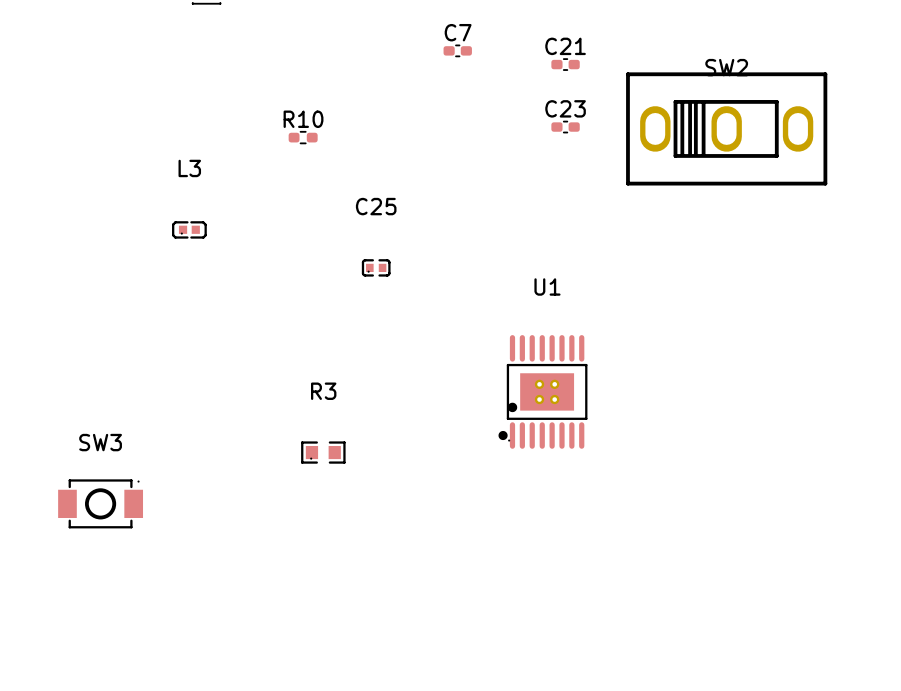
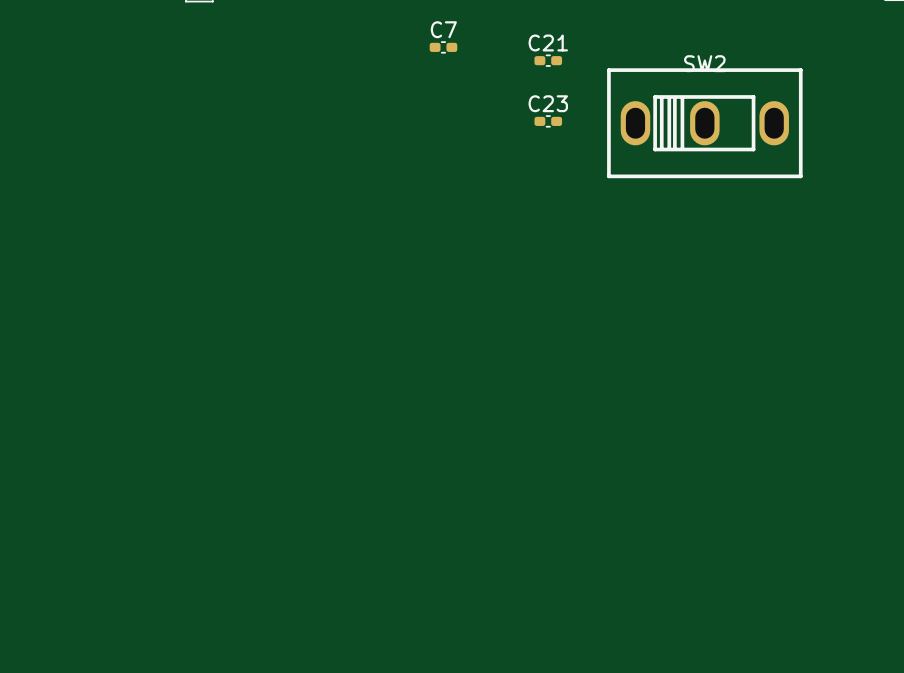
R10: (303, 137) -> none
L3: (189, 229) -> none
C25: (376, 267) -> none
U1: (542, 391) -> none
R3: (323, 452) -> none
SW3: (100, 503) -> none

